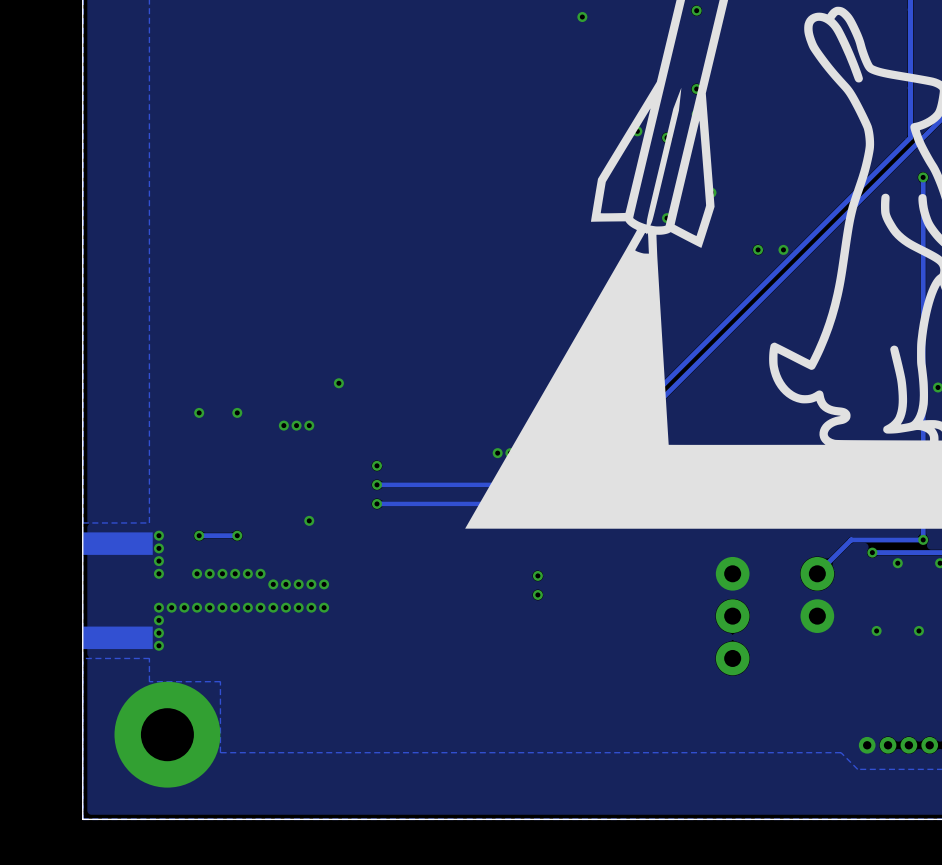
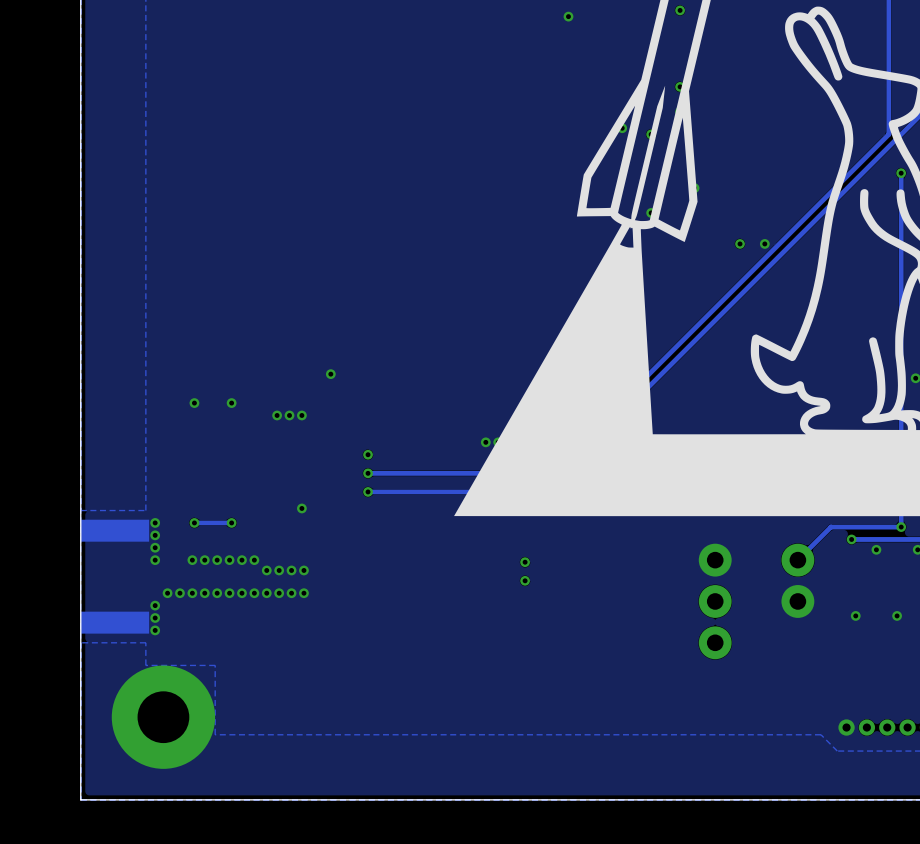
via: (324, 584) -> none
via: (158, 607) -> none
via: (324, 607) -> none

